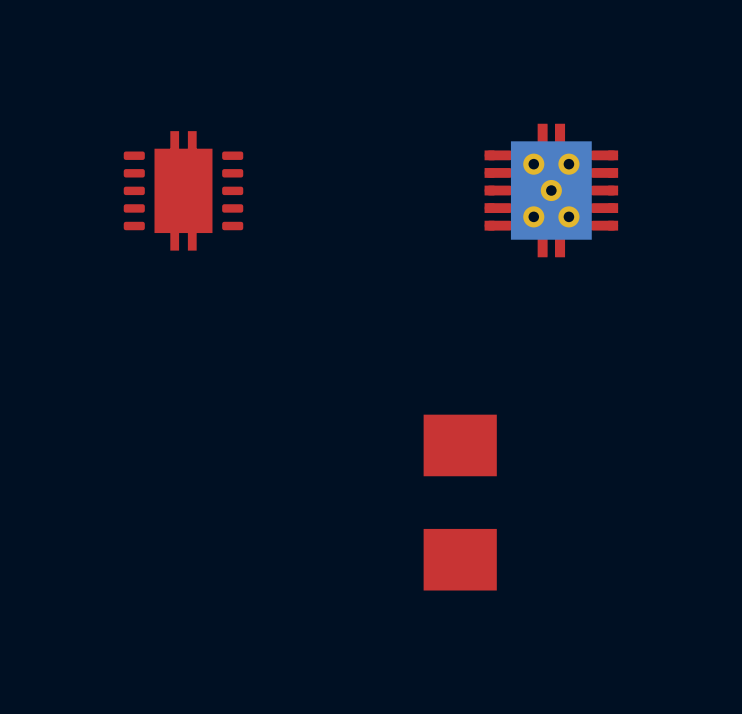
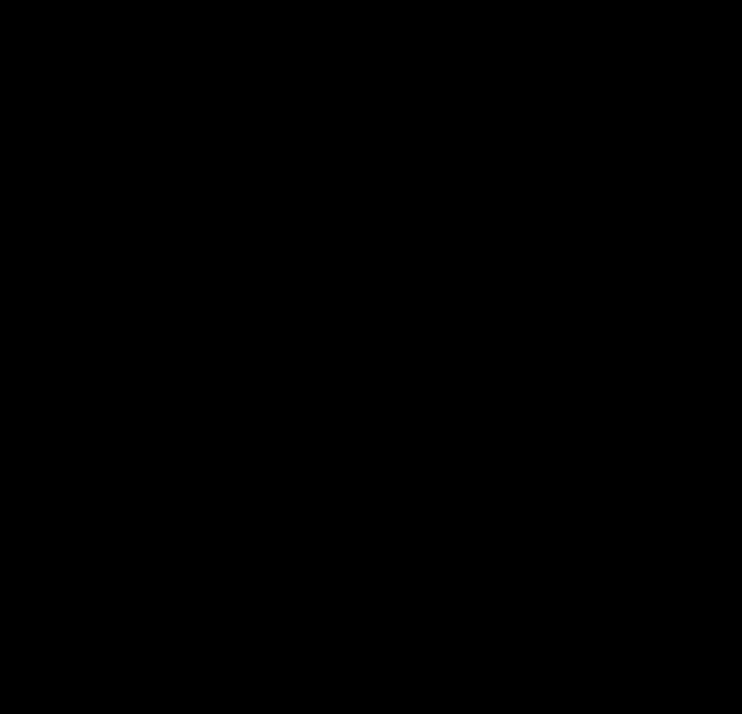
part: (183, 190) -> none
part: (551, 190) -> none
part: (460, 502) -> none

